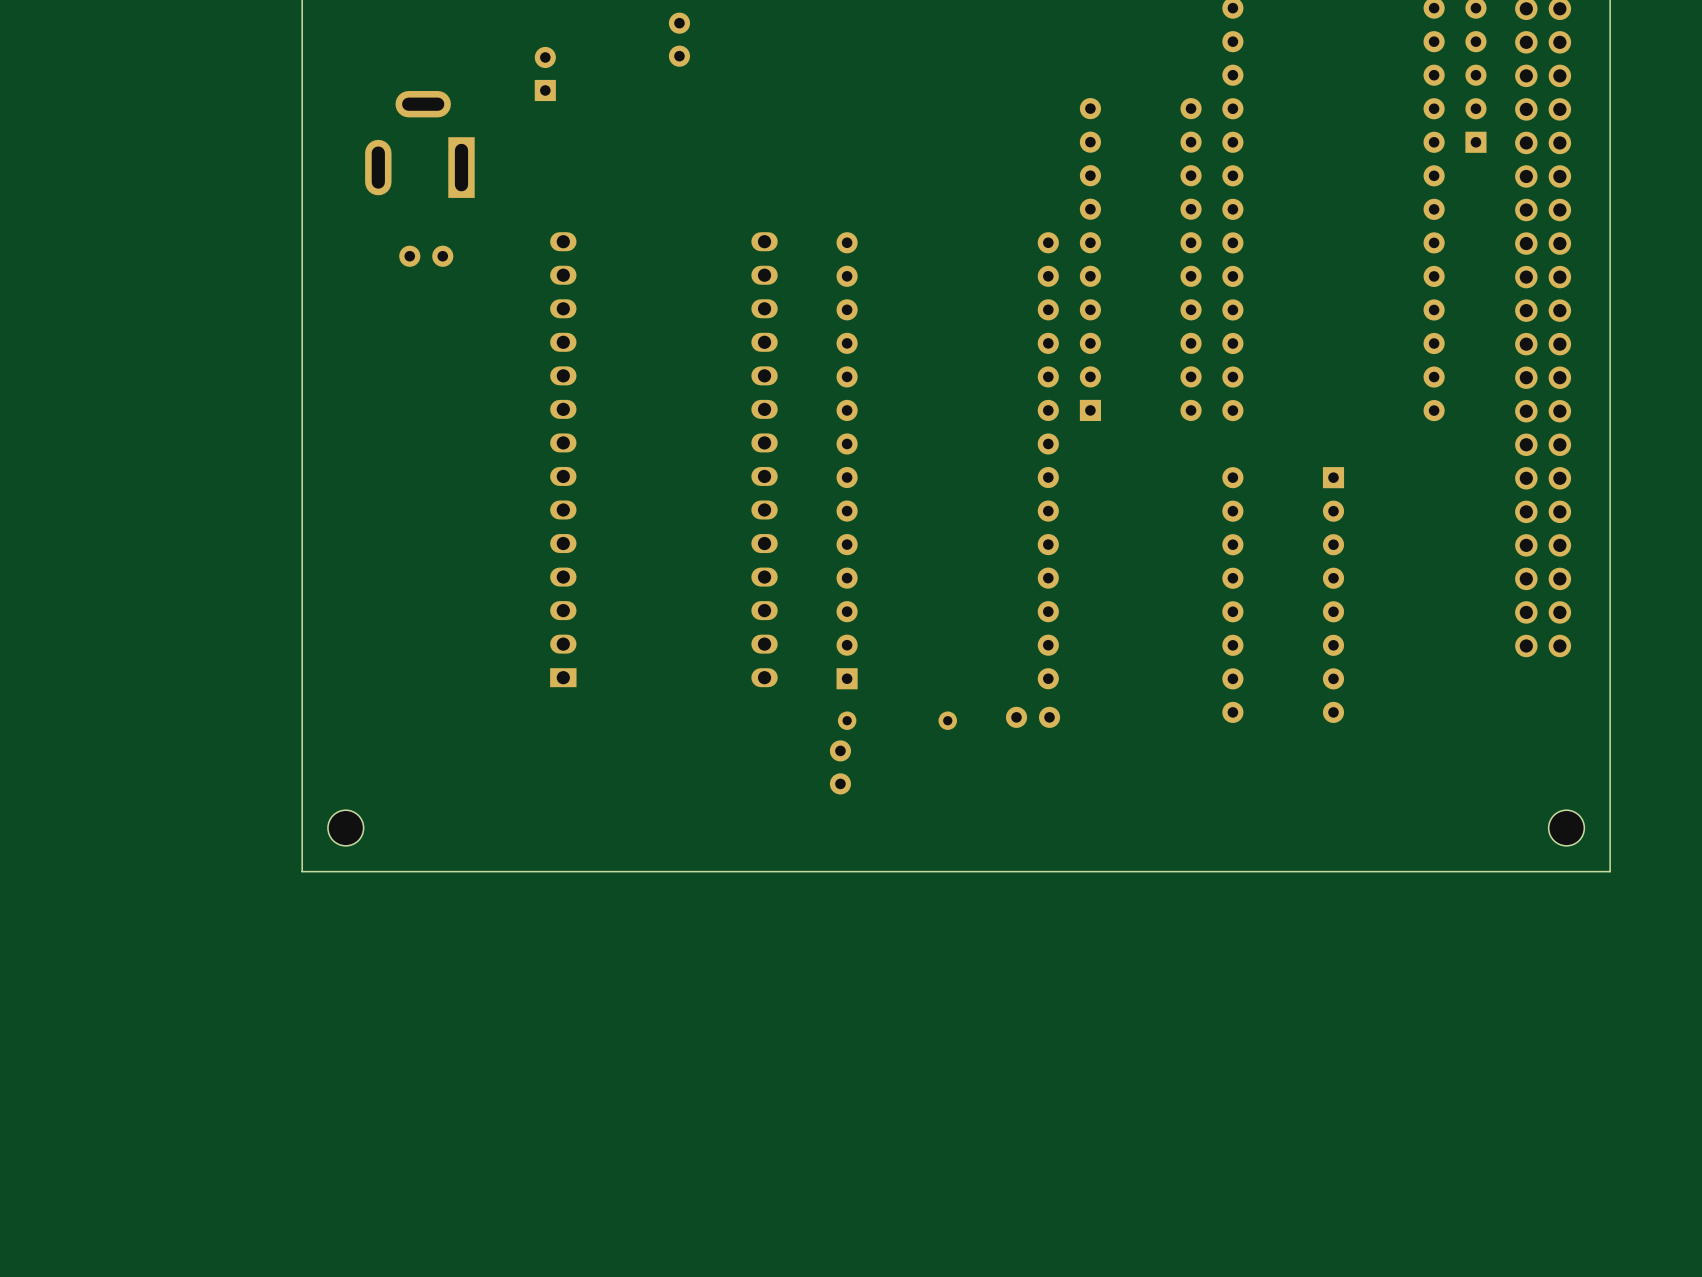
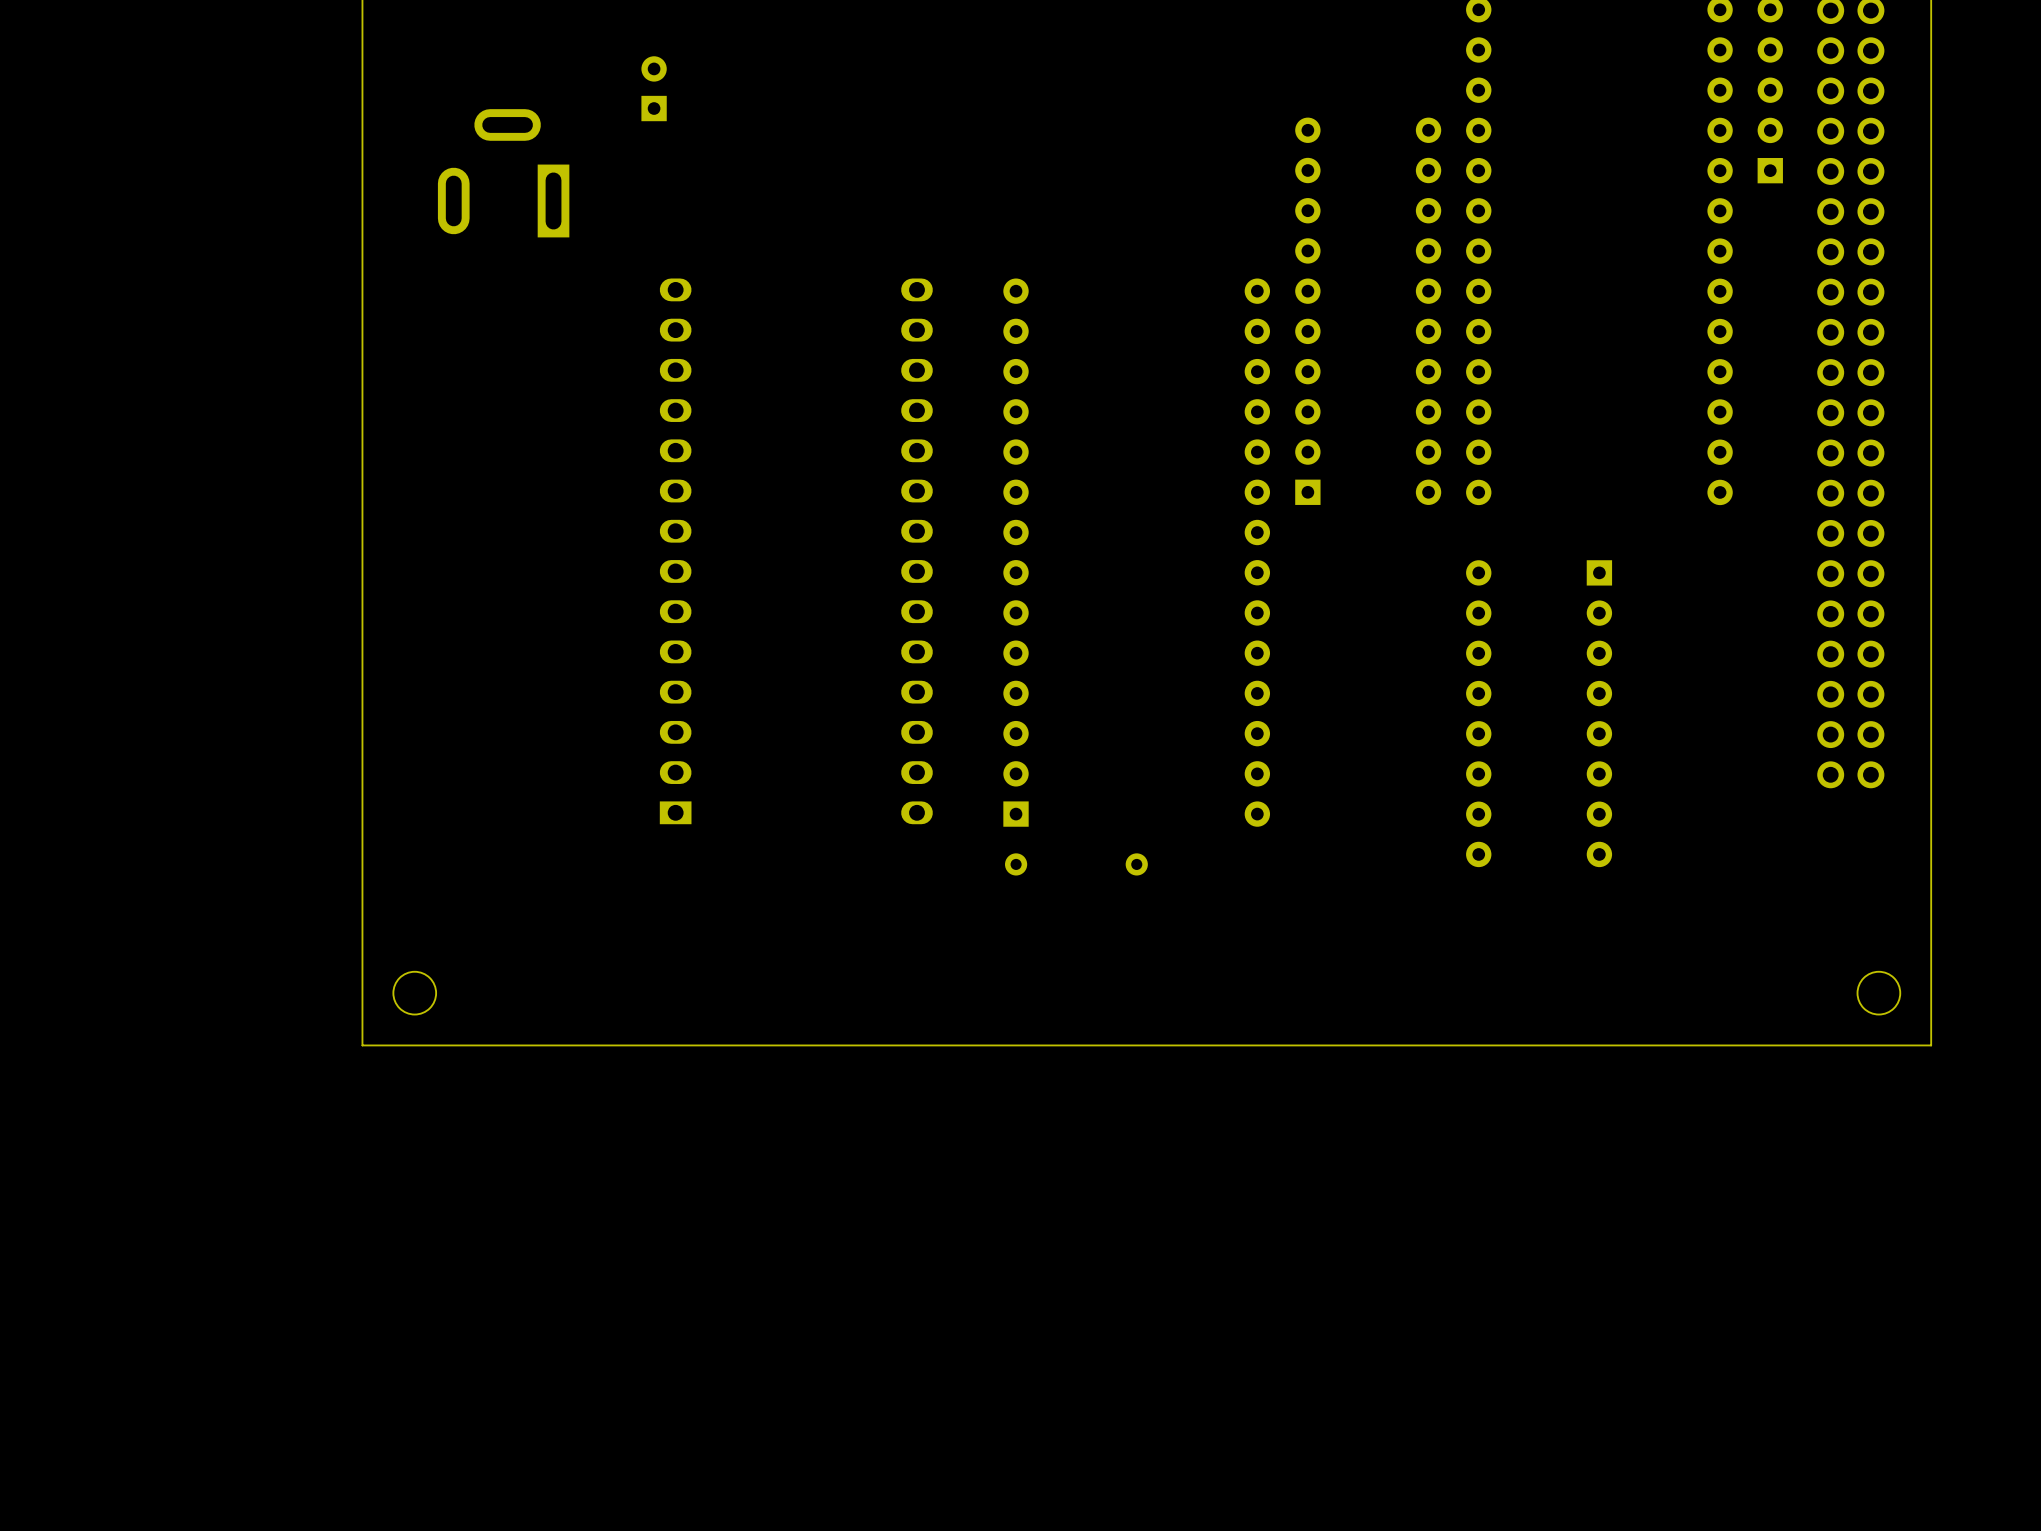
part: (679, 39) -> none
part: (426, 256) -> none
part: (1033, 717) -> none
part: (840, 767) -> none

